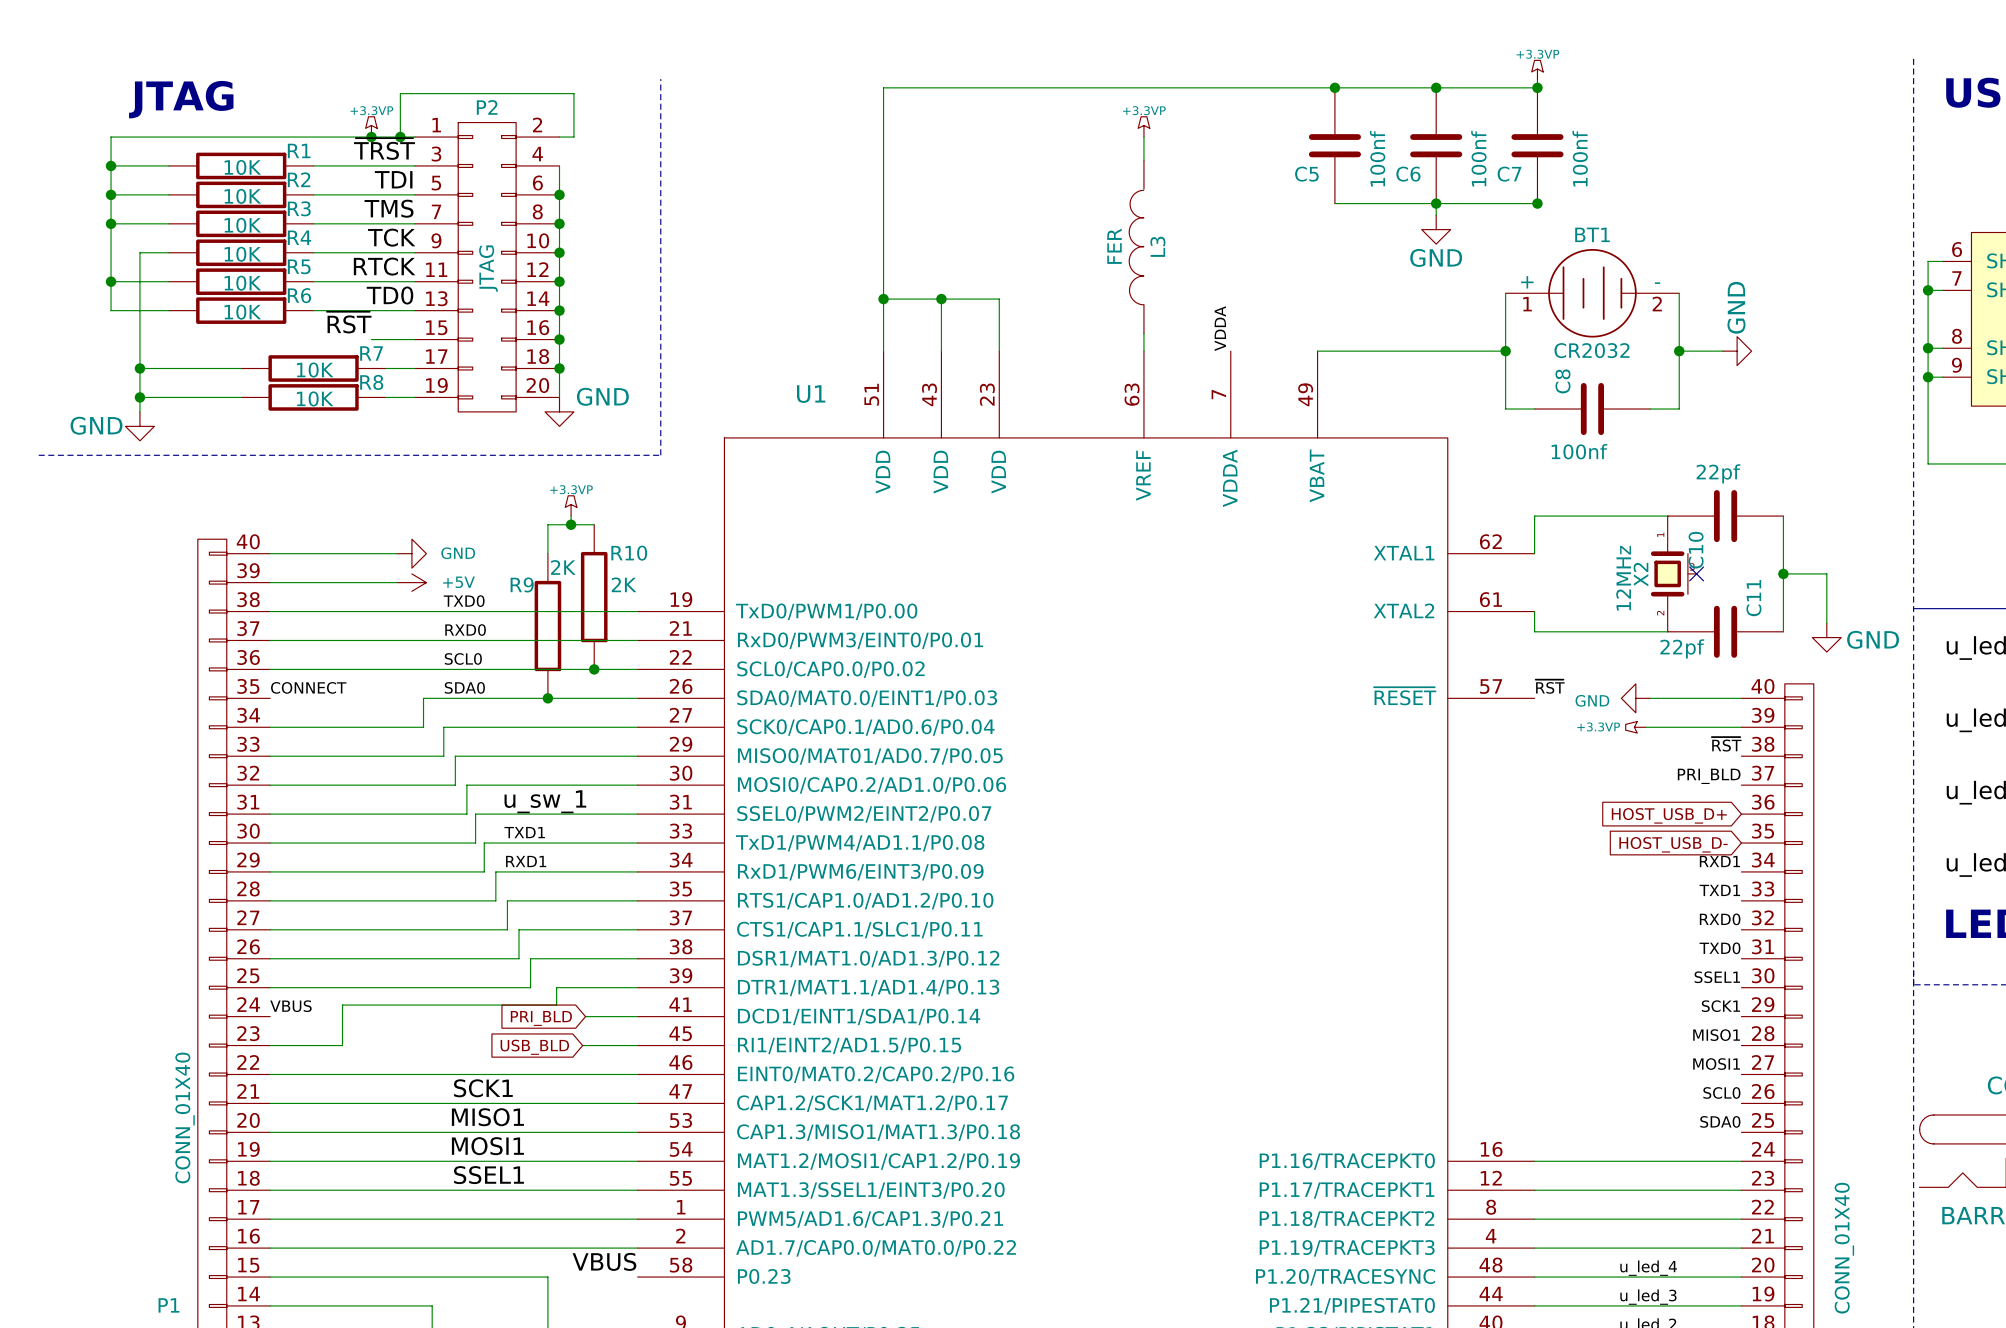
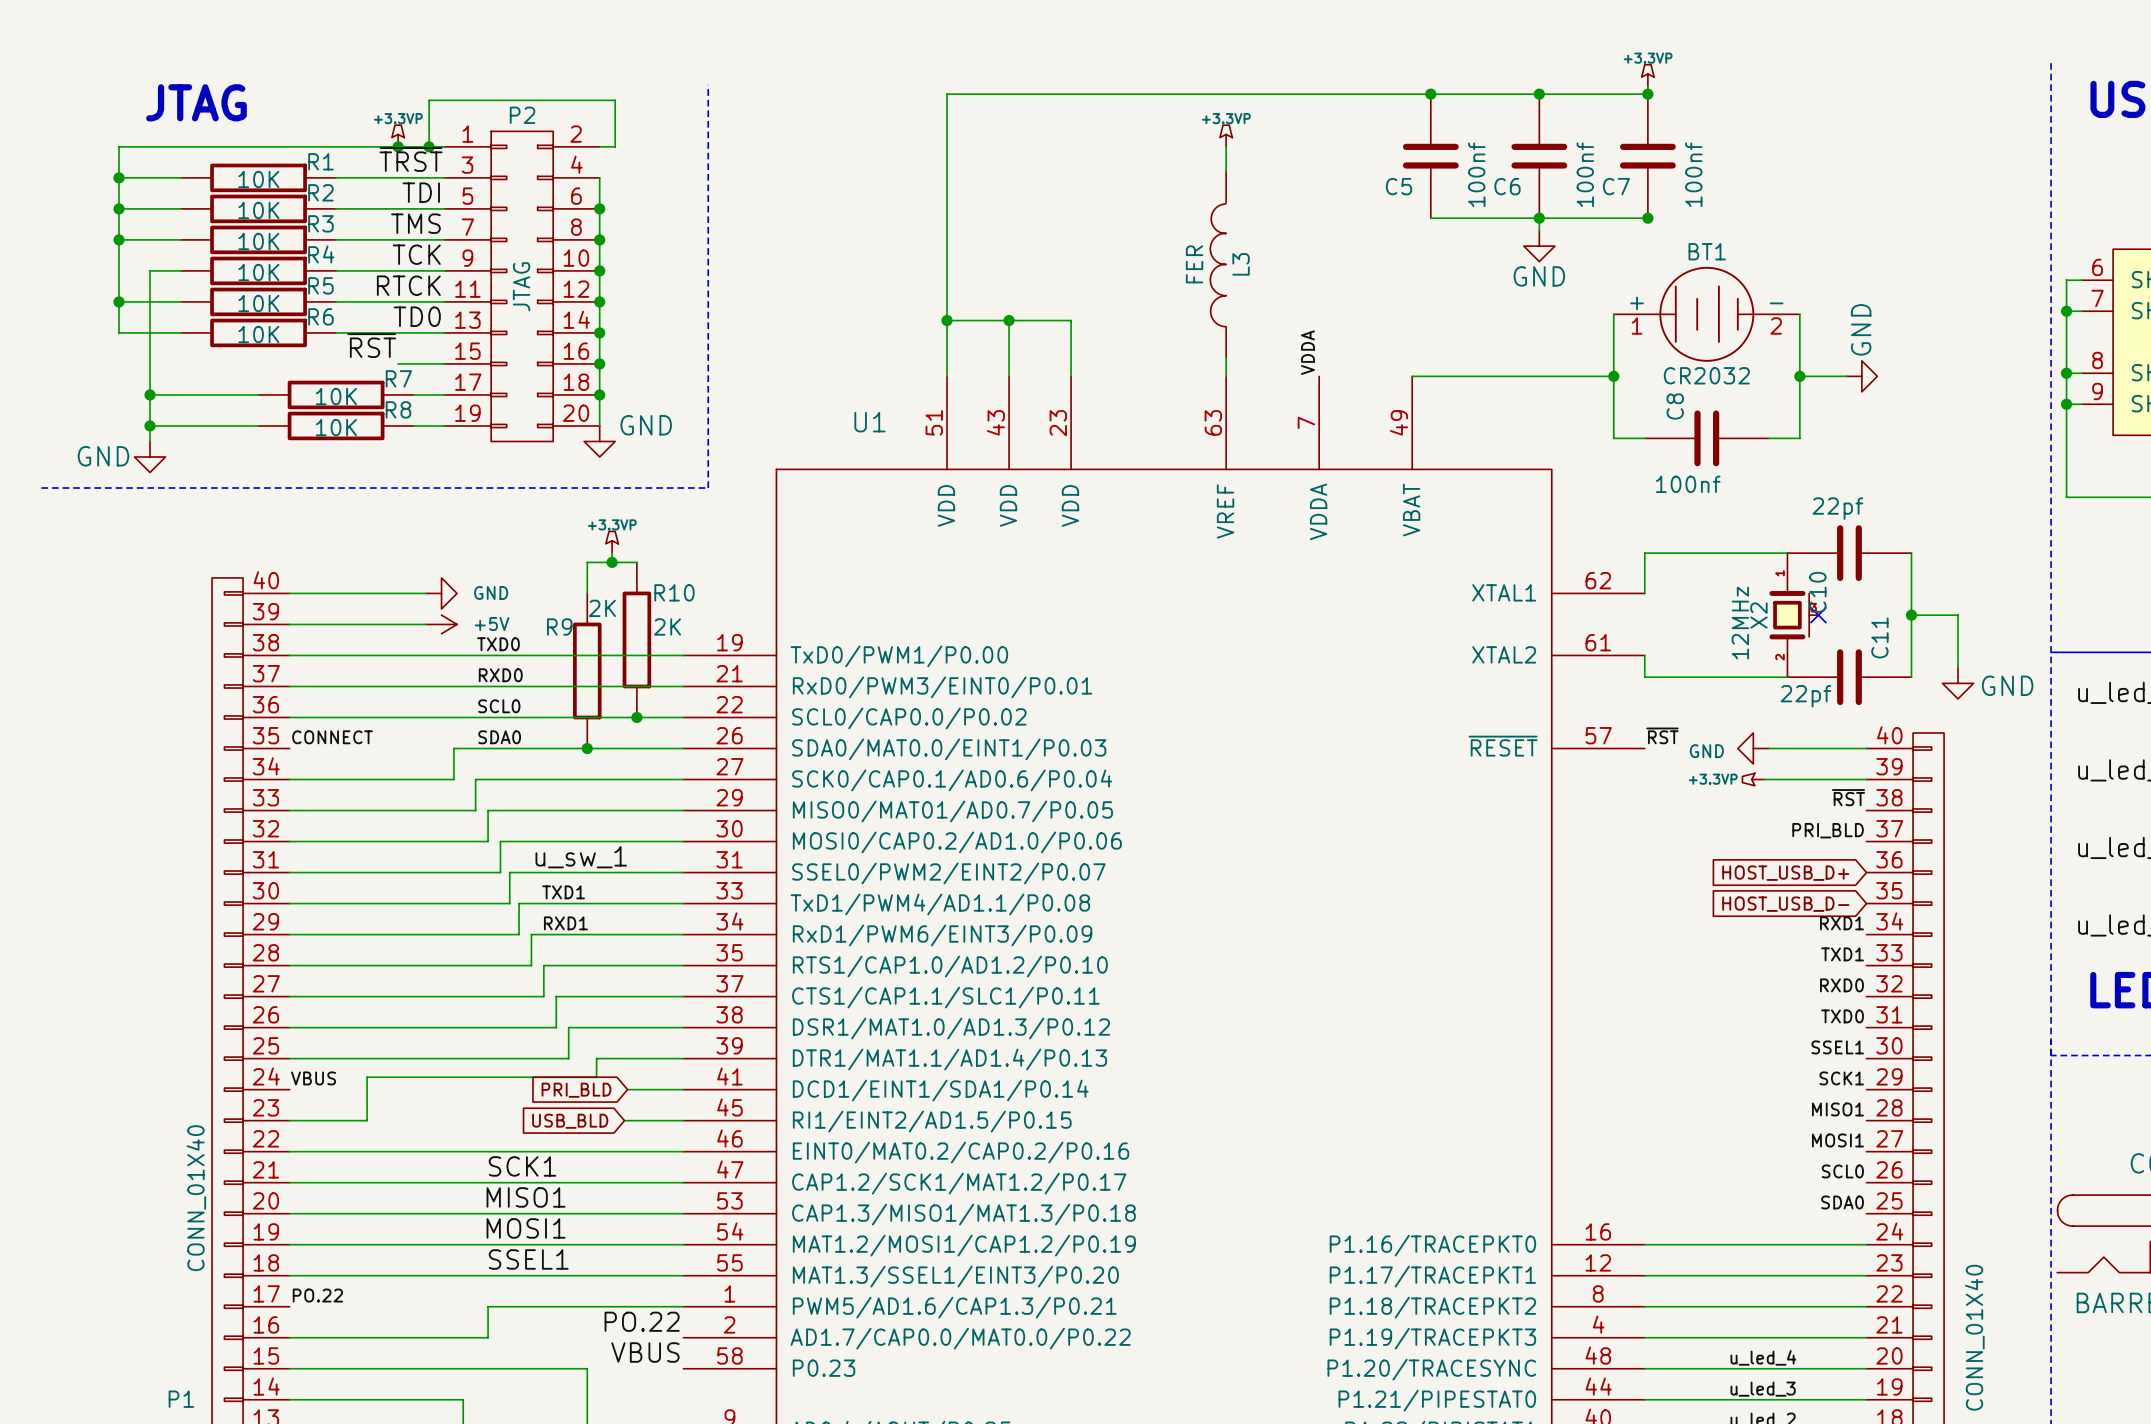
label: none -> PO.22 (317, 1295)
wire: (270, 1219) (455, 1219) -> none
label: none -> PO.22 (642, 1321)
wire: (455, 1248) (637, 1248) -> (488, 1337) (488, 1306)

